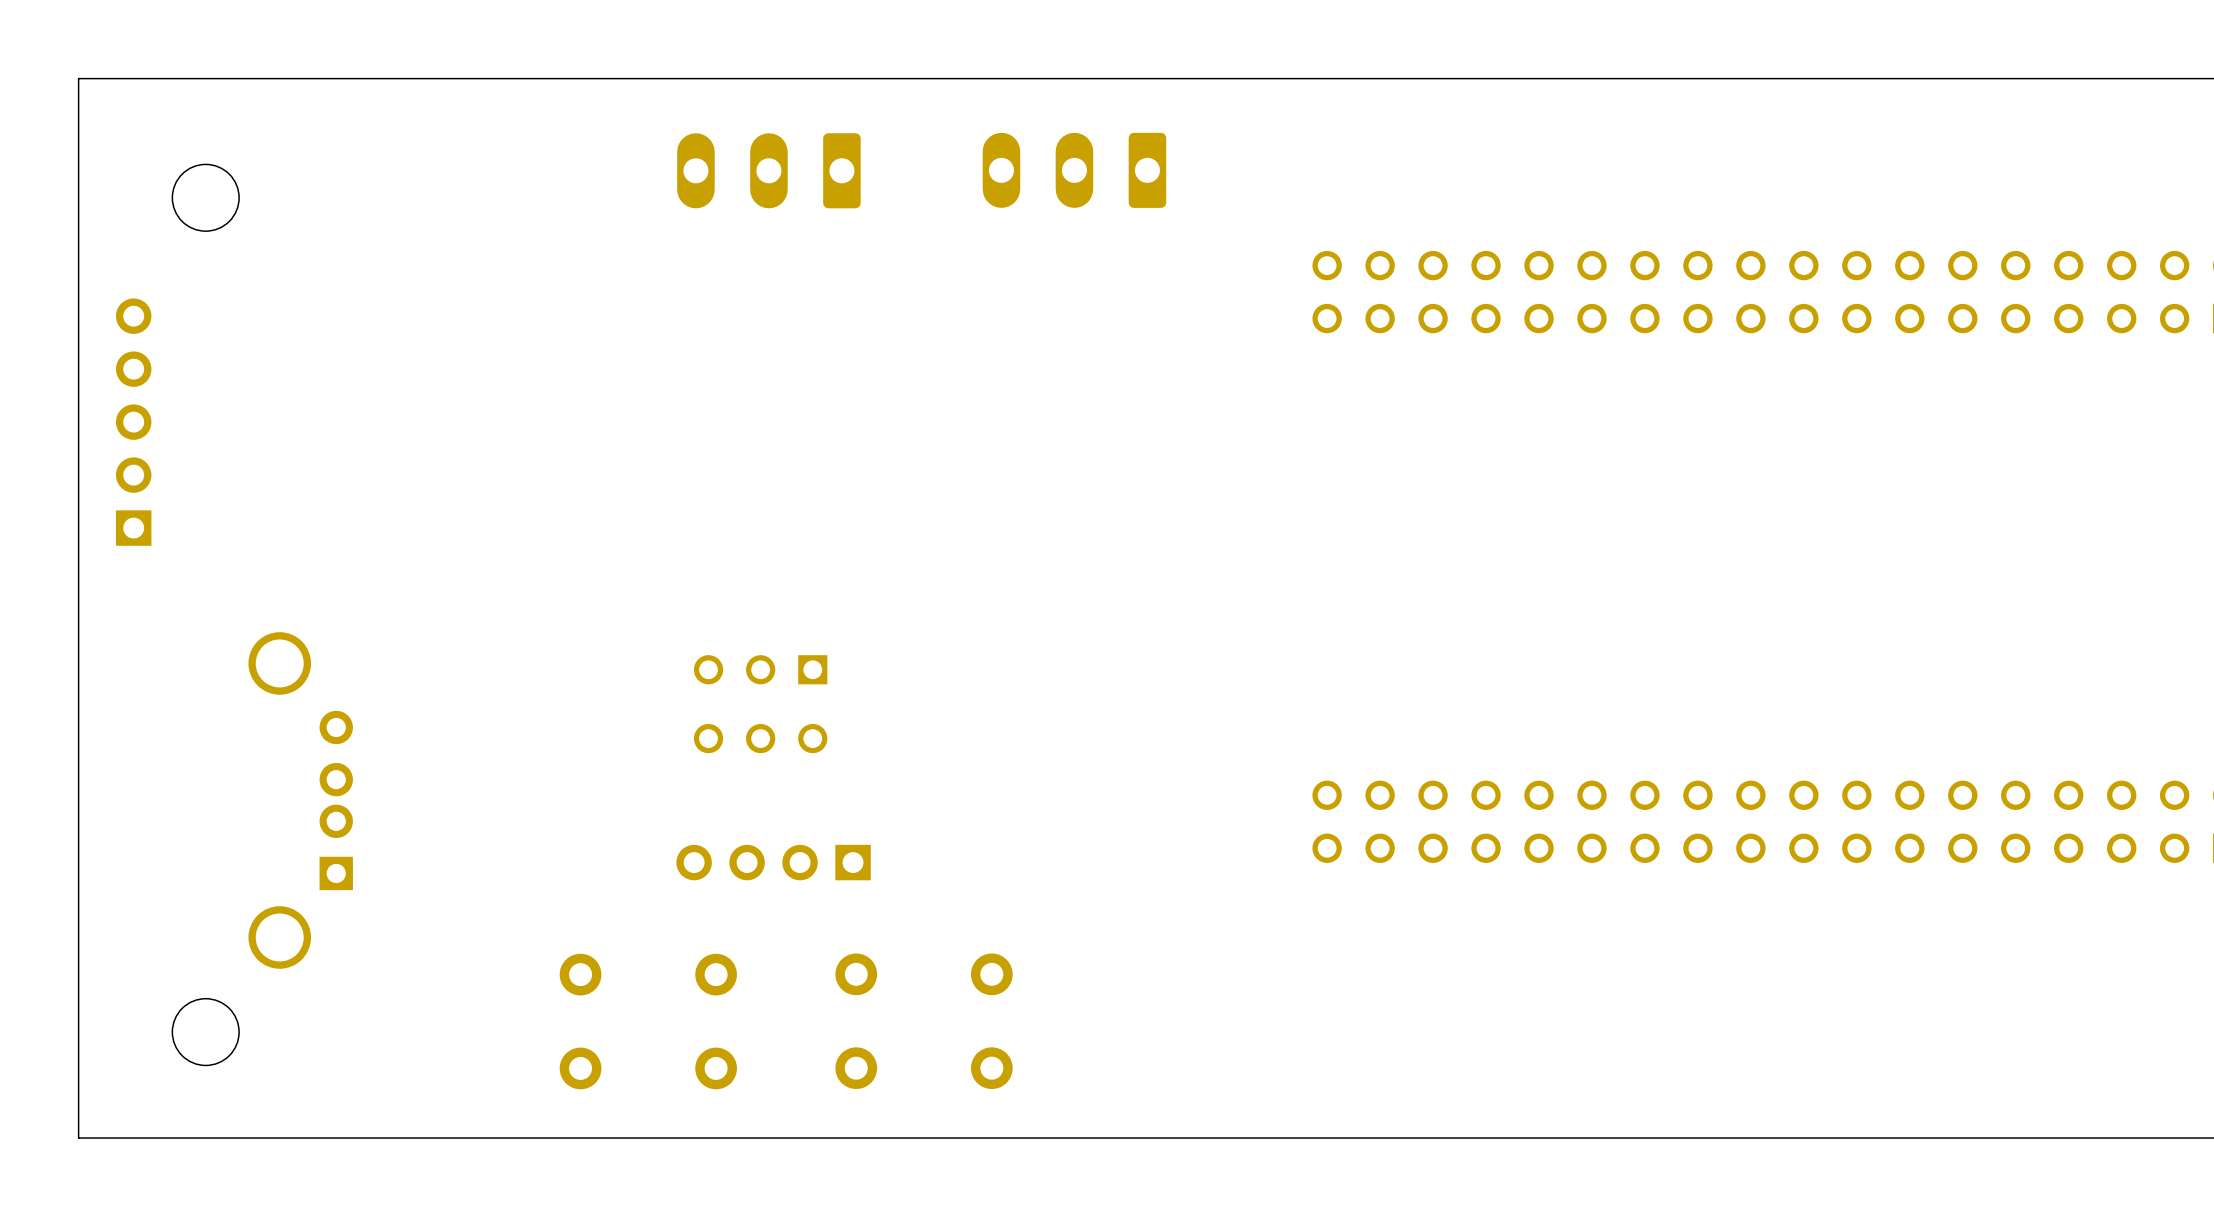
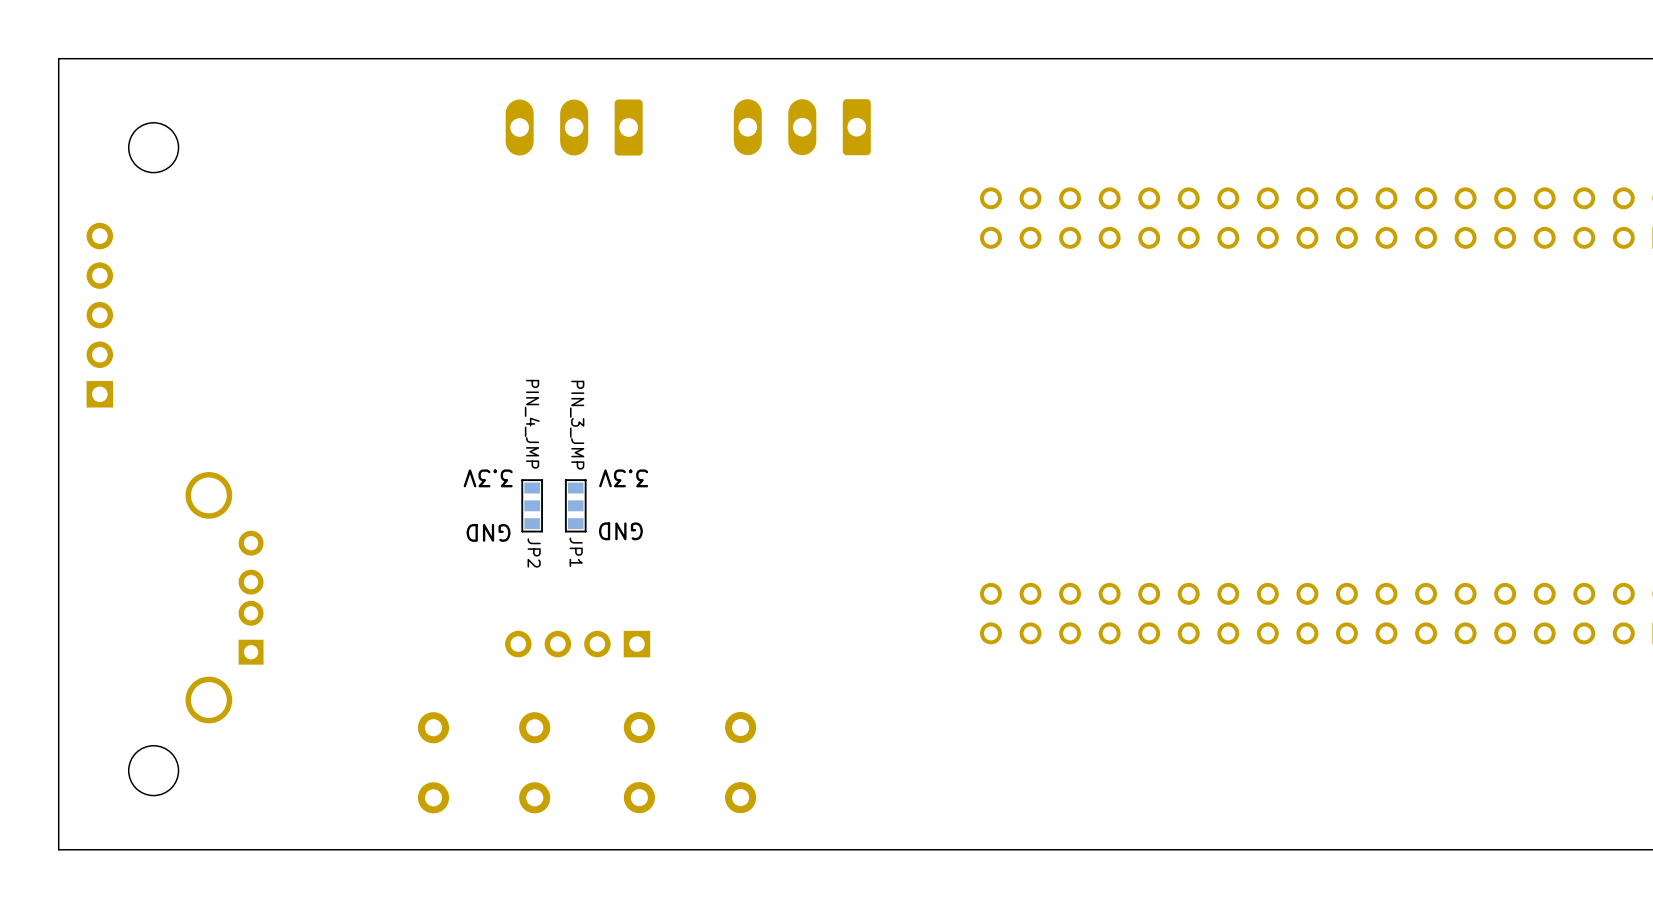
text: none -> 3.3V (488, 478)
text: none -> 3.3V (623, 478)
JP2: none -> PIN_4_JMP (532, 505)
JP1: none -> PIN_3_JMP (575, 505)
part: (760, 704) -> none
text: none -> GND (620, 531)
text: none -> GND (488, 532)

